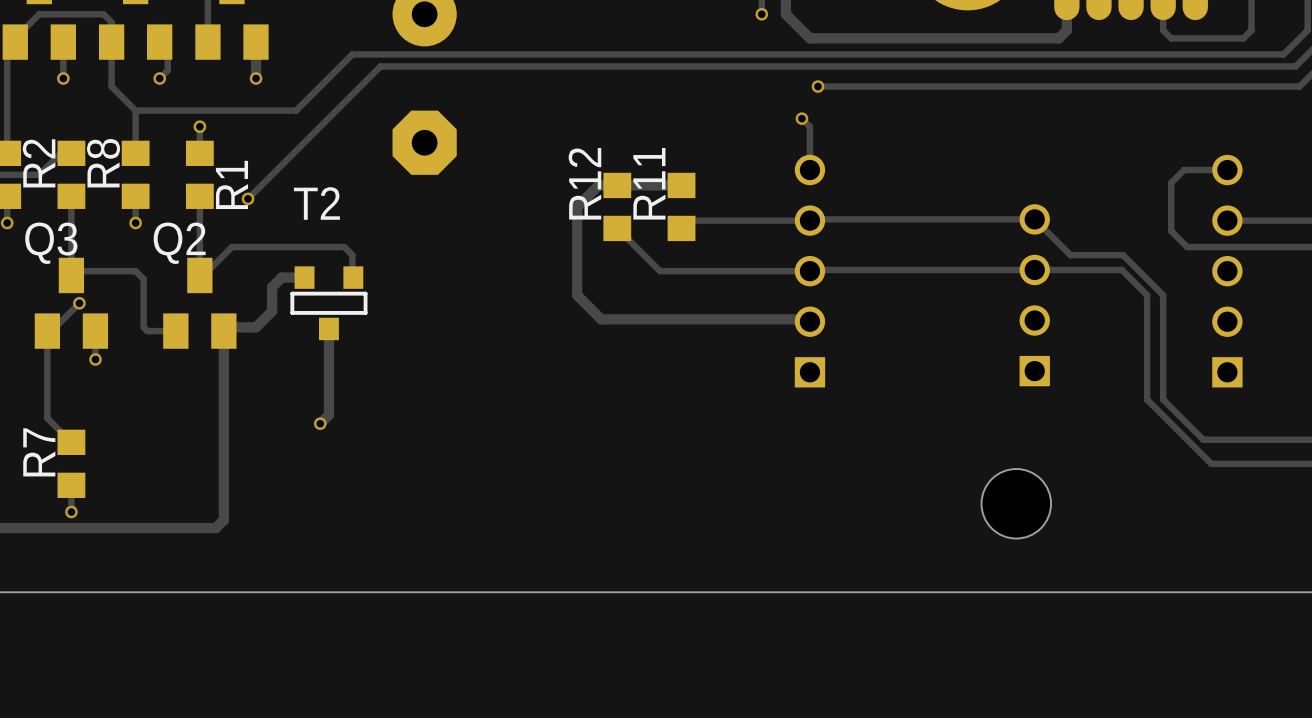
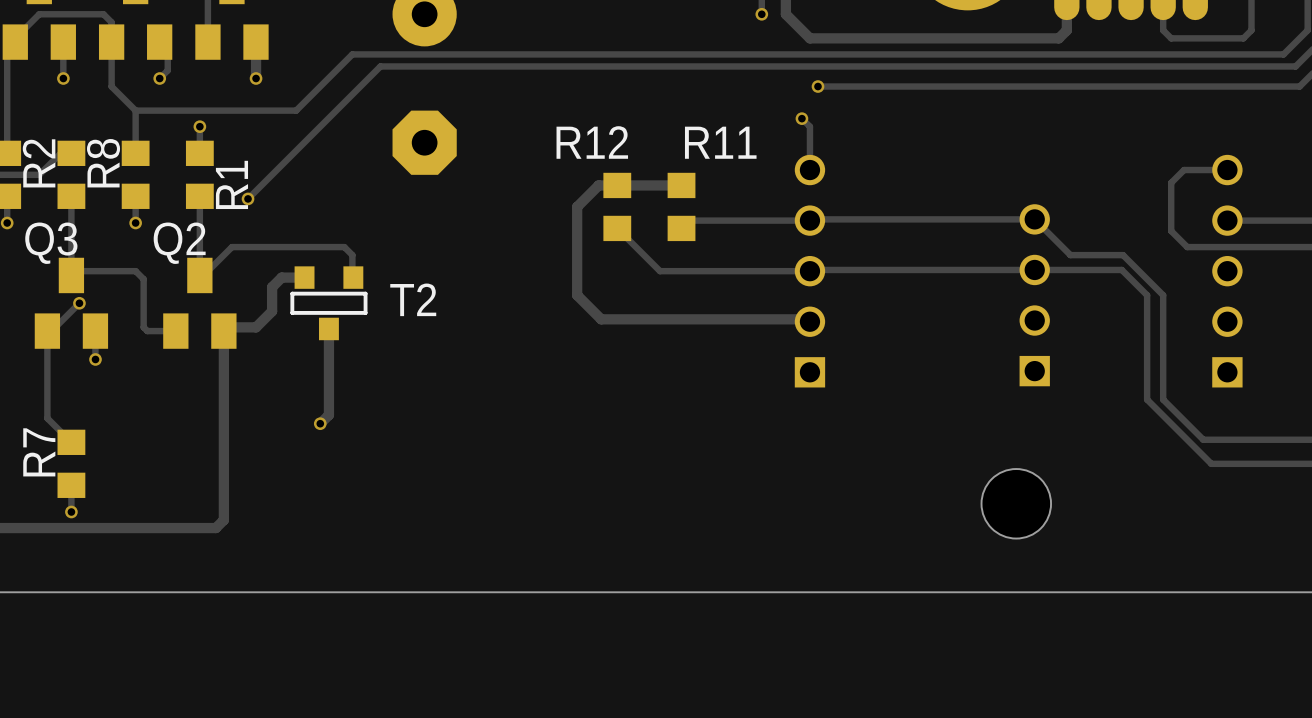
R12 name rotation: 0° (584, 183) -> 90° clockwise (592, 142)
R11 name rotation: 0° (649, 183) -> 90° clockwise (720, 142)
T2 name position: T2 (316, 203) -> T2 (413, 299)

